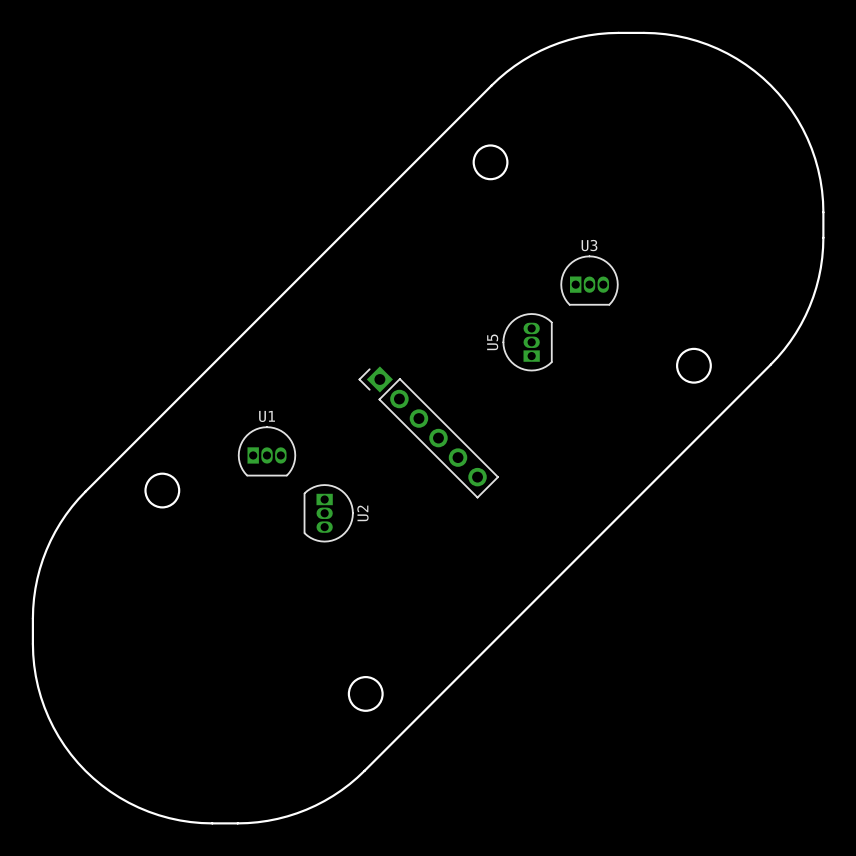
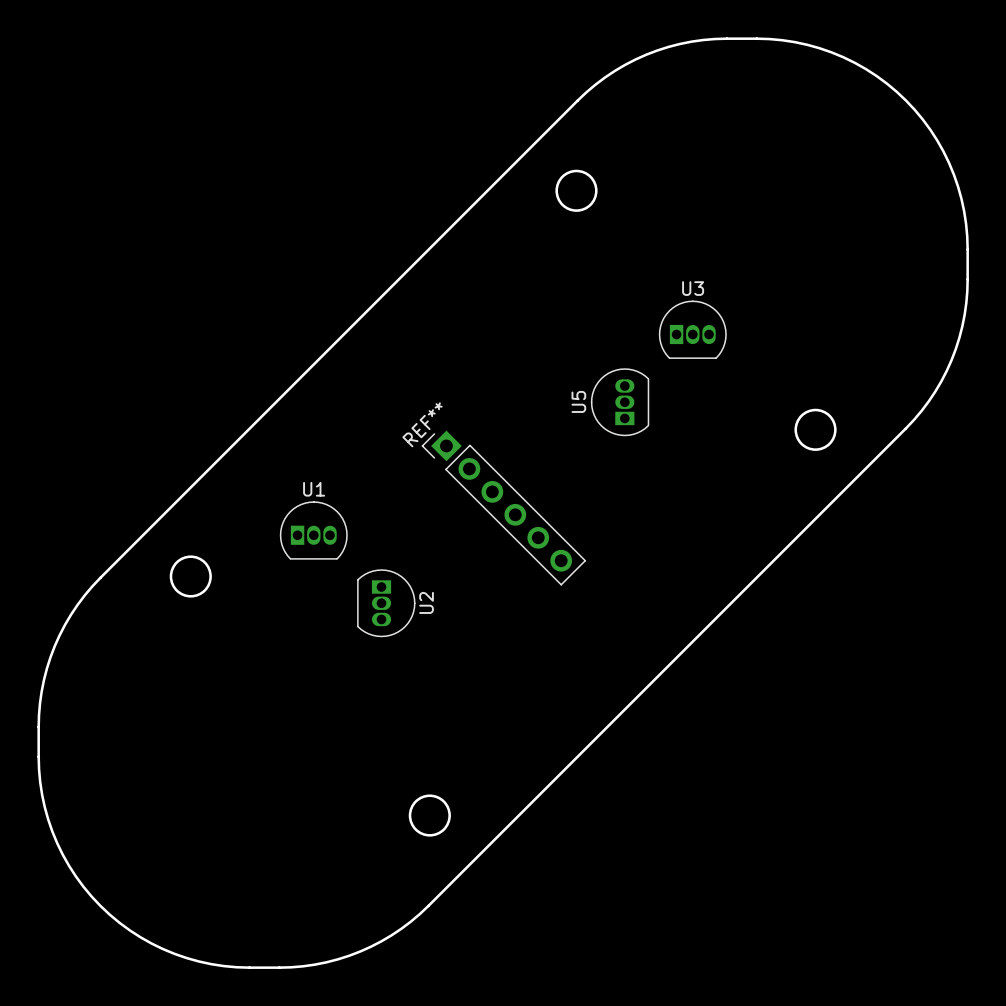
REF** name: none -> REF** (422, 424)

